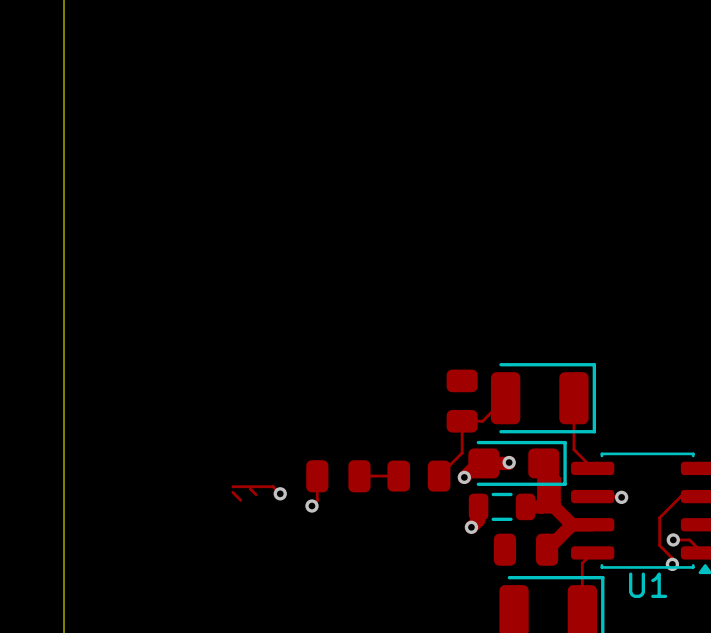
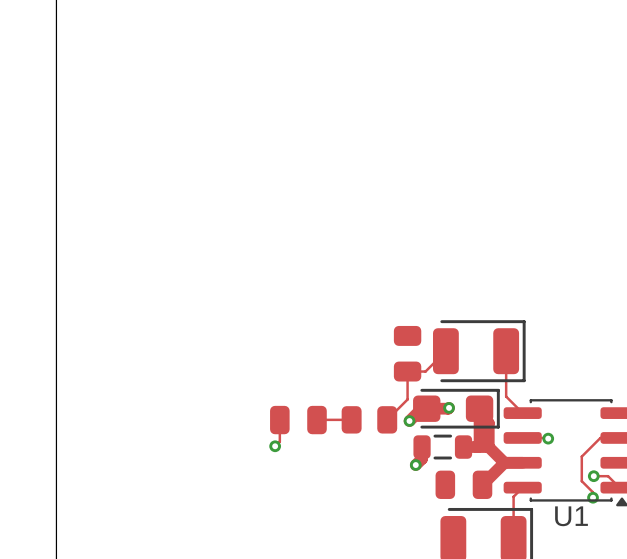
track: (232, 486) (273, 486) (280, 493) -> none
track: (250, 487) (256, 494) -> none
track: (232, 492) (240, 500) -> none
via: (280, 493) -> none

